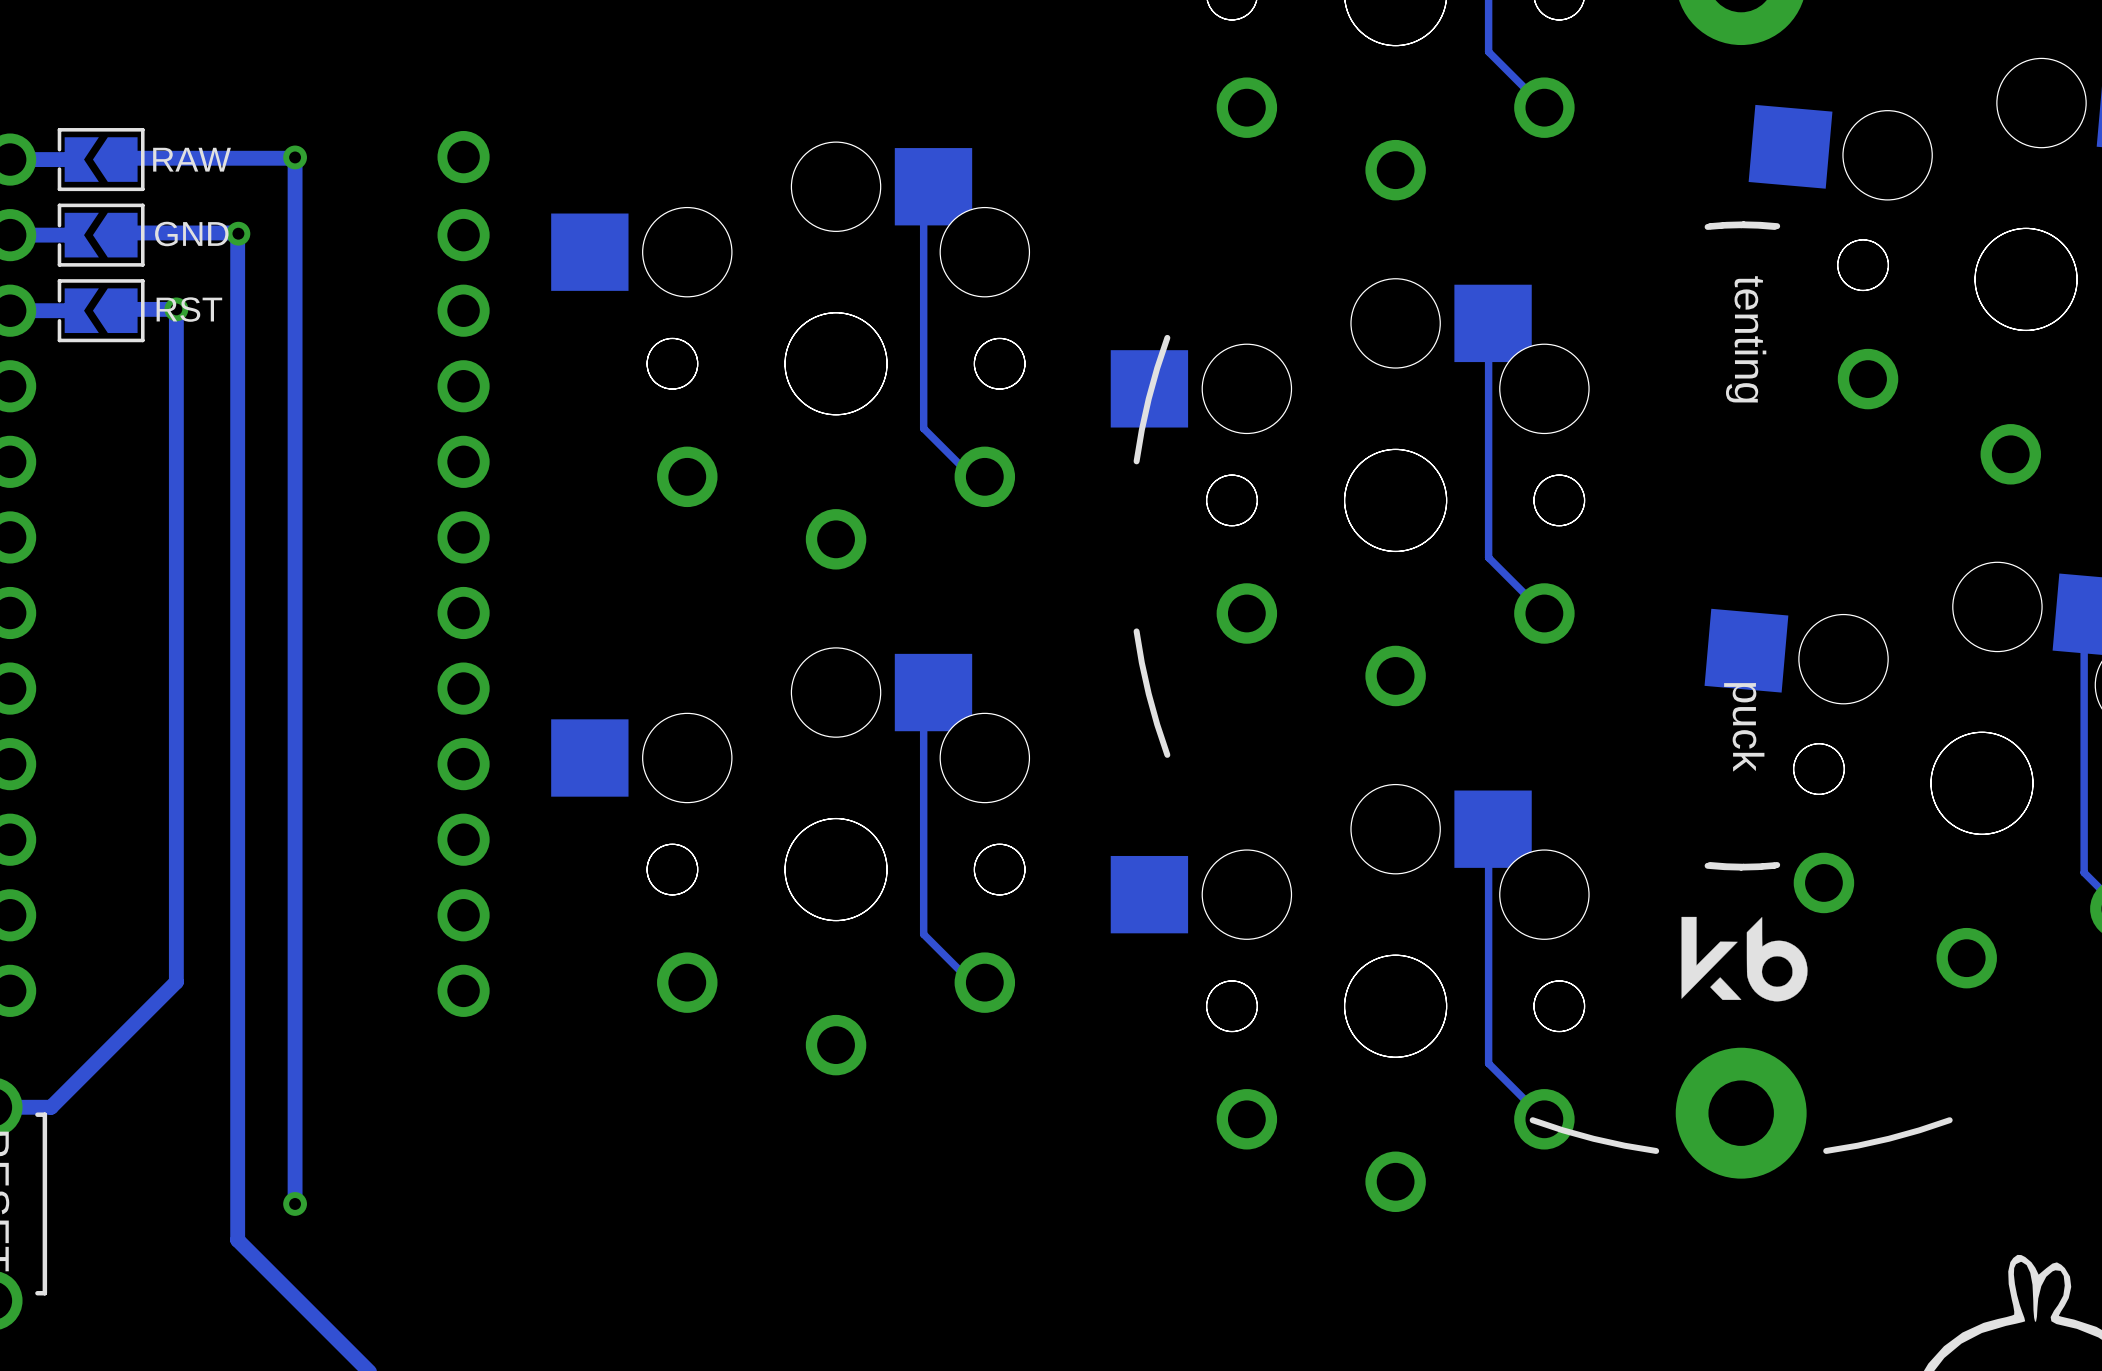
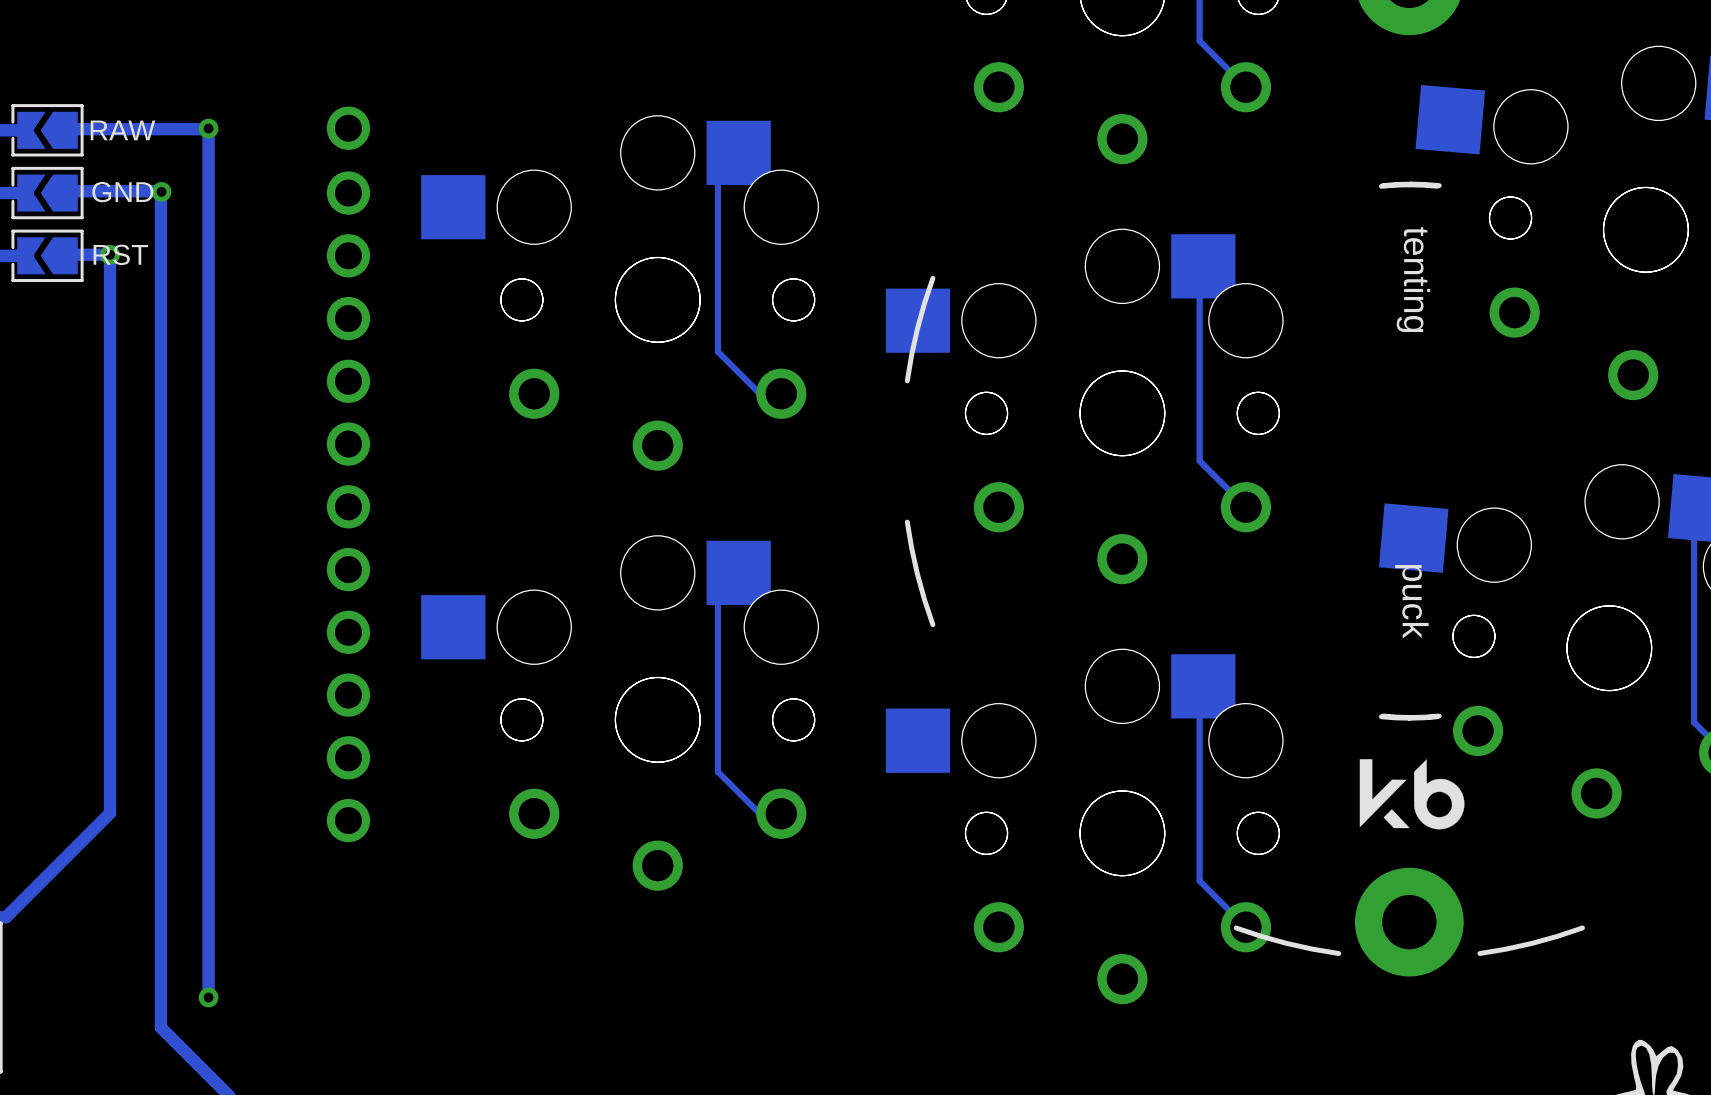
track: (937, 203) (923, 217) (923, 428) (971, 476) (984, 476) -> (729, 165) (717, 176) (717, 351) (758, 391) (768, 391)
track: (937, 709) (923, 723) (923, 934) (988, 999) -> (729, 585) (717, 596) (717, 771) (772, 826)

